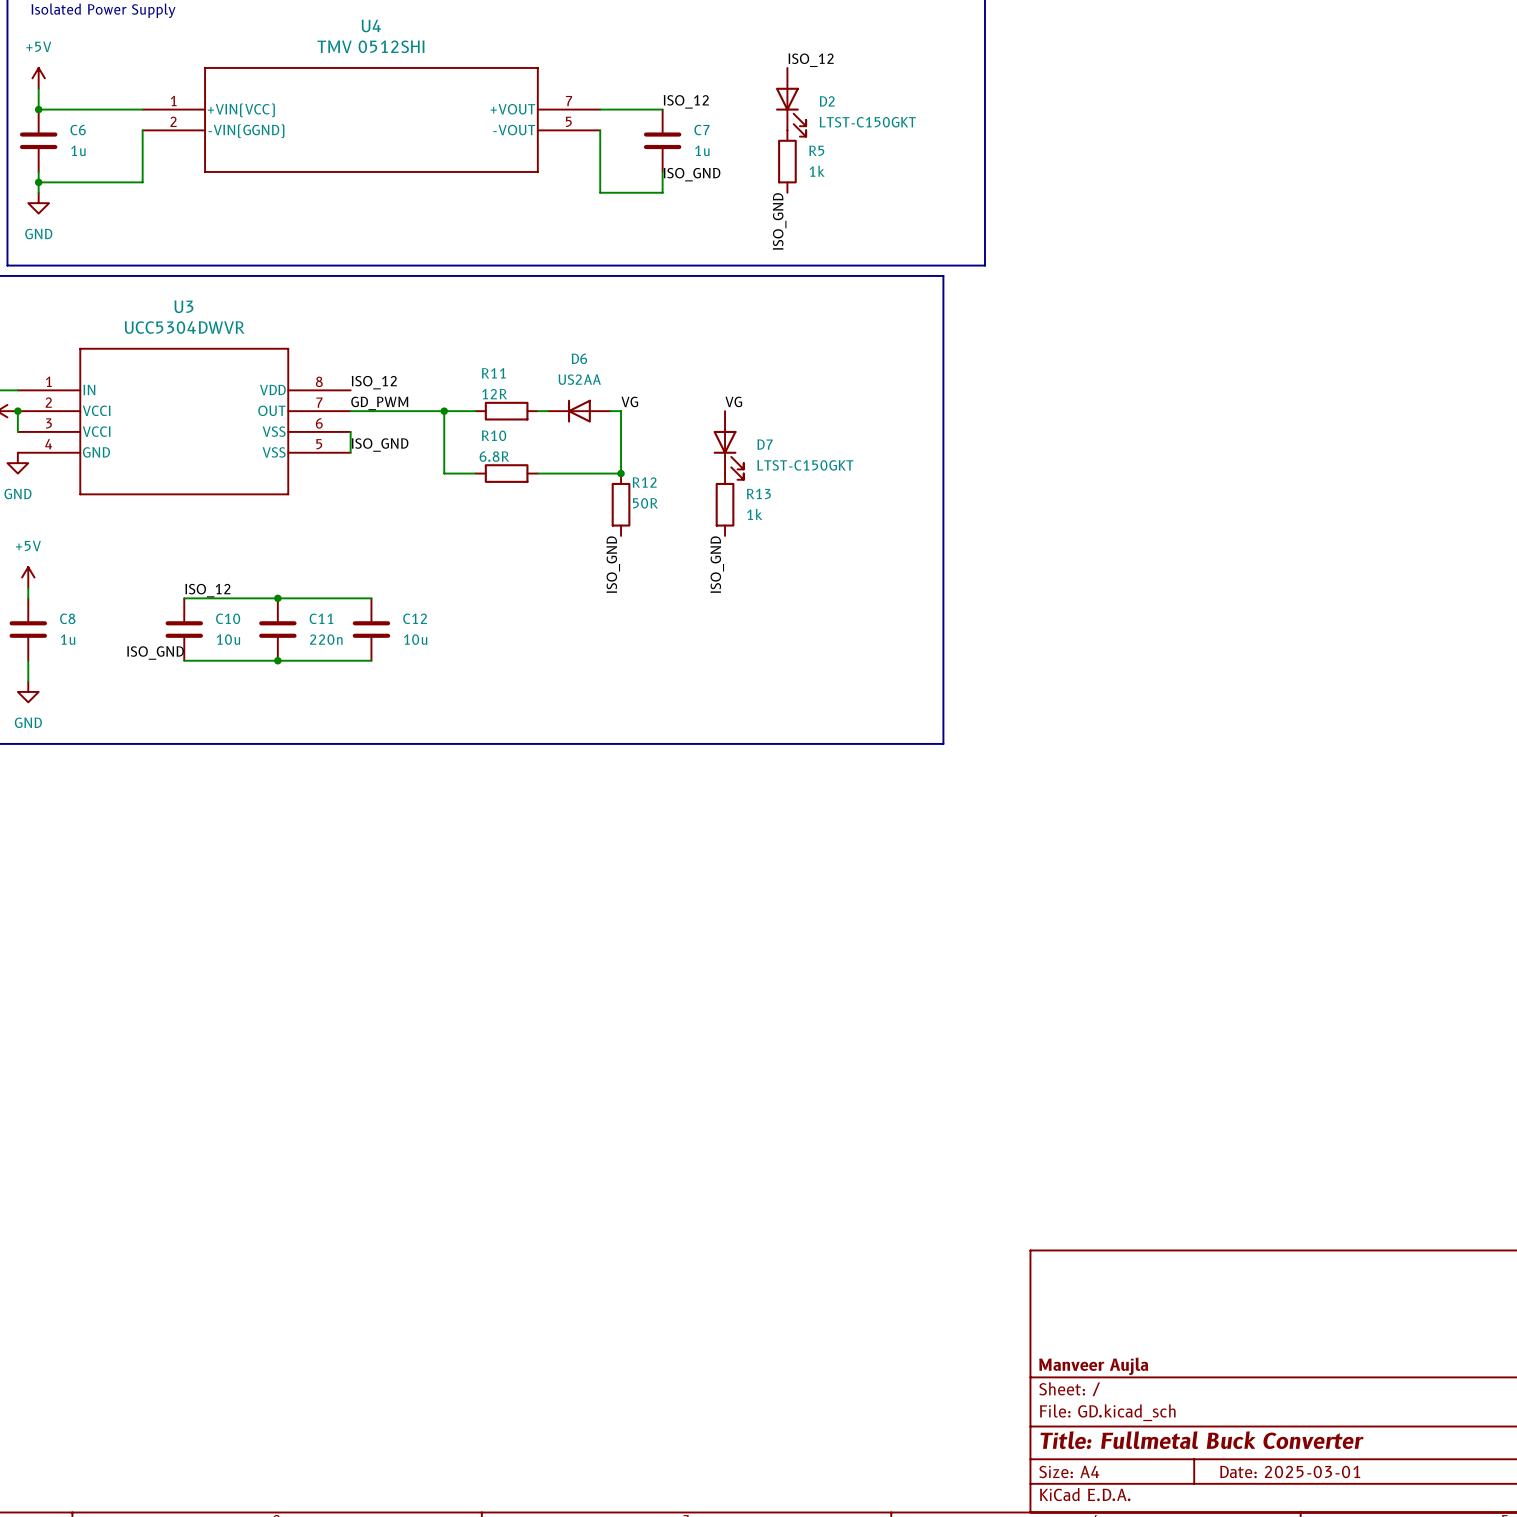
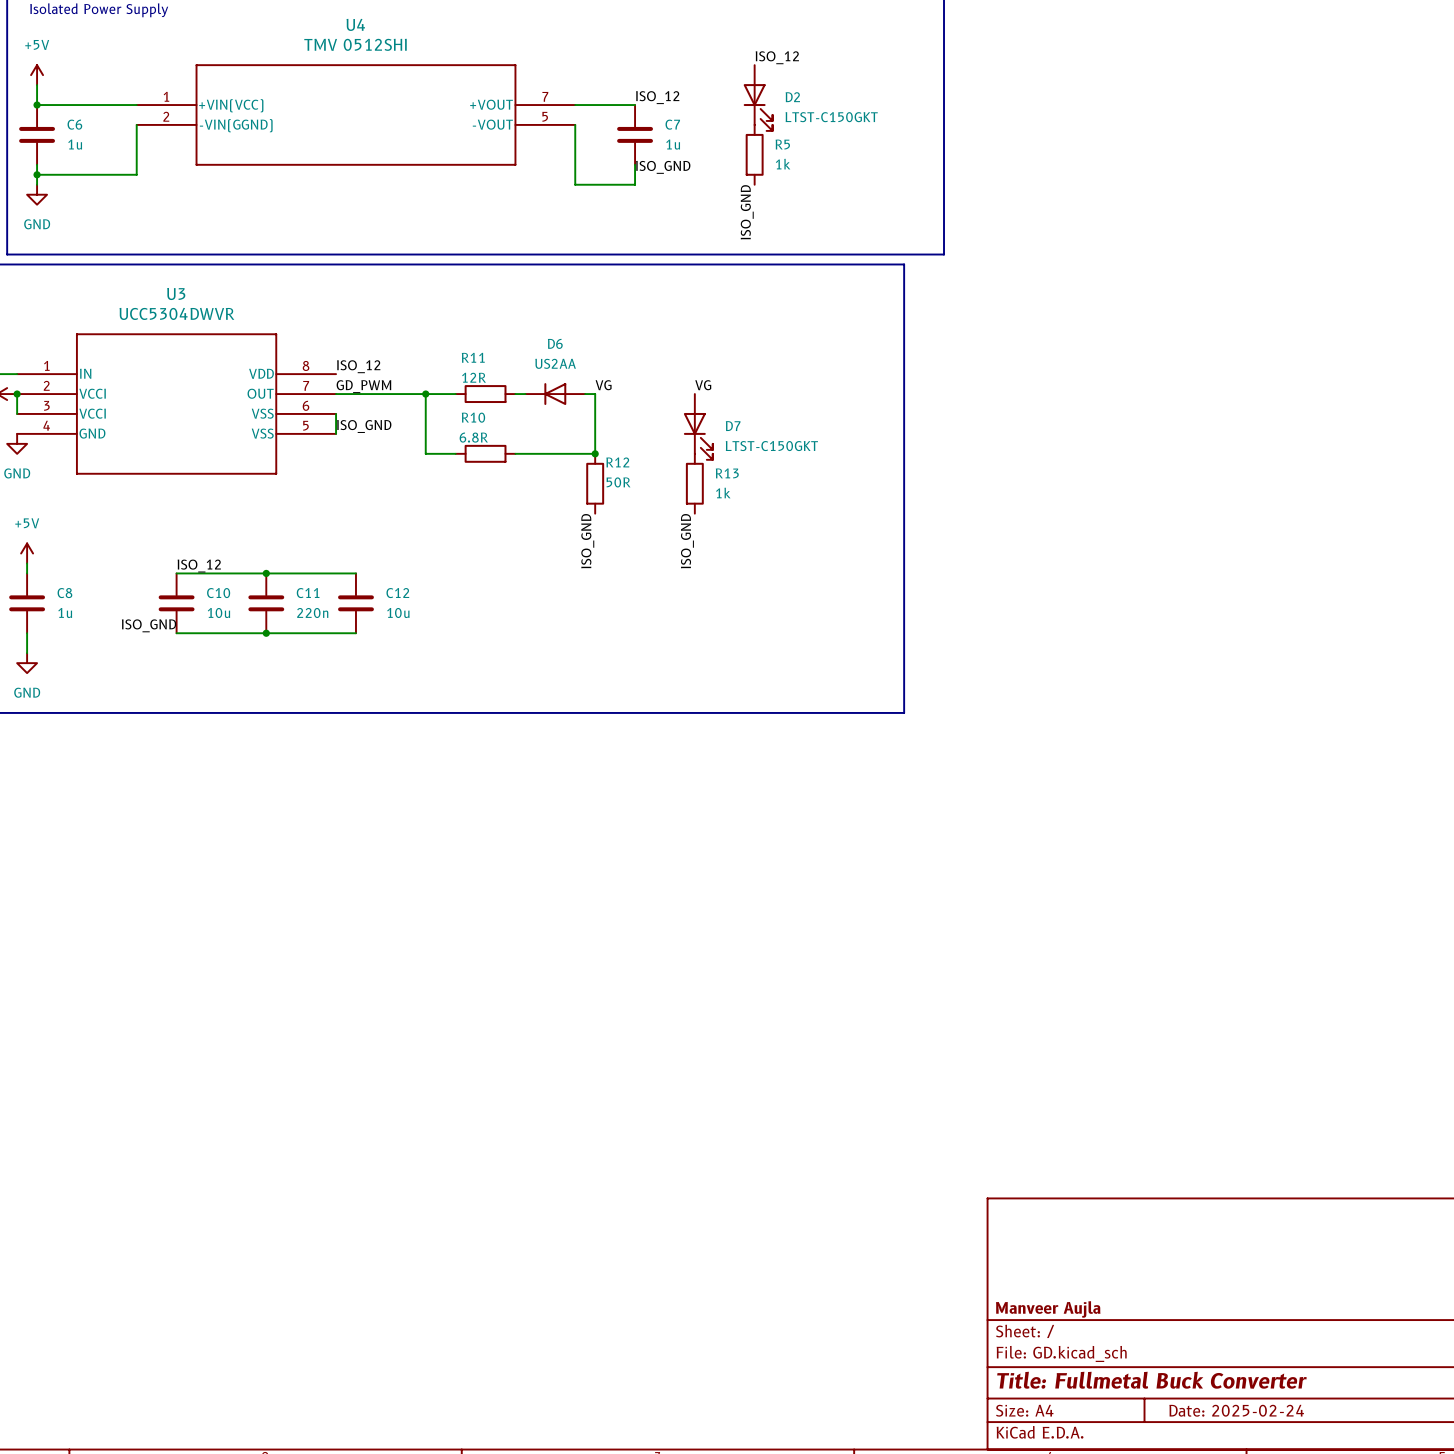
title block: Date: 2025-03-01 (1290, 1471) -> Date: 2025-02-24 (1236, 1410)

